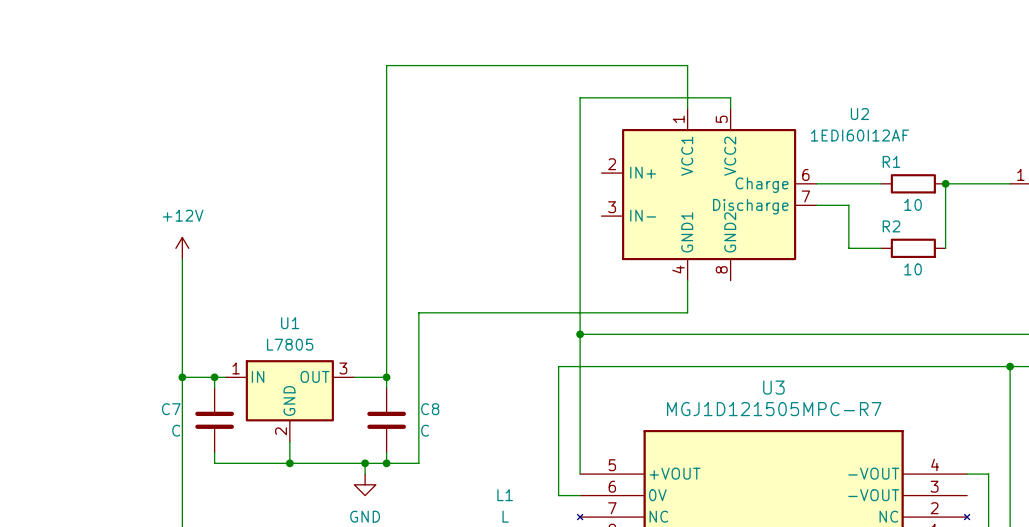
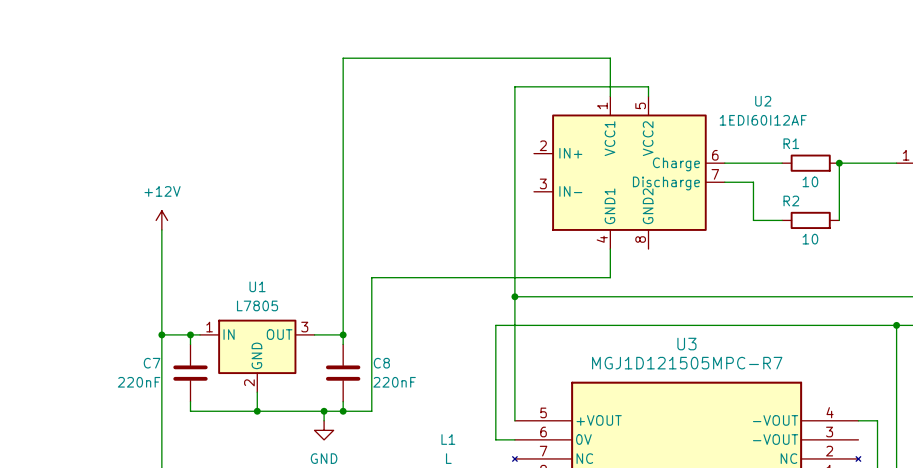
C7 value: C (176, 430) -> 220nF (139, 382)
C8 value: C (425, 430) -> 220nF (394, 382)

